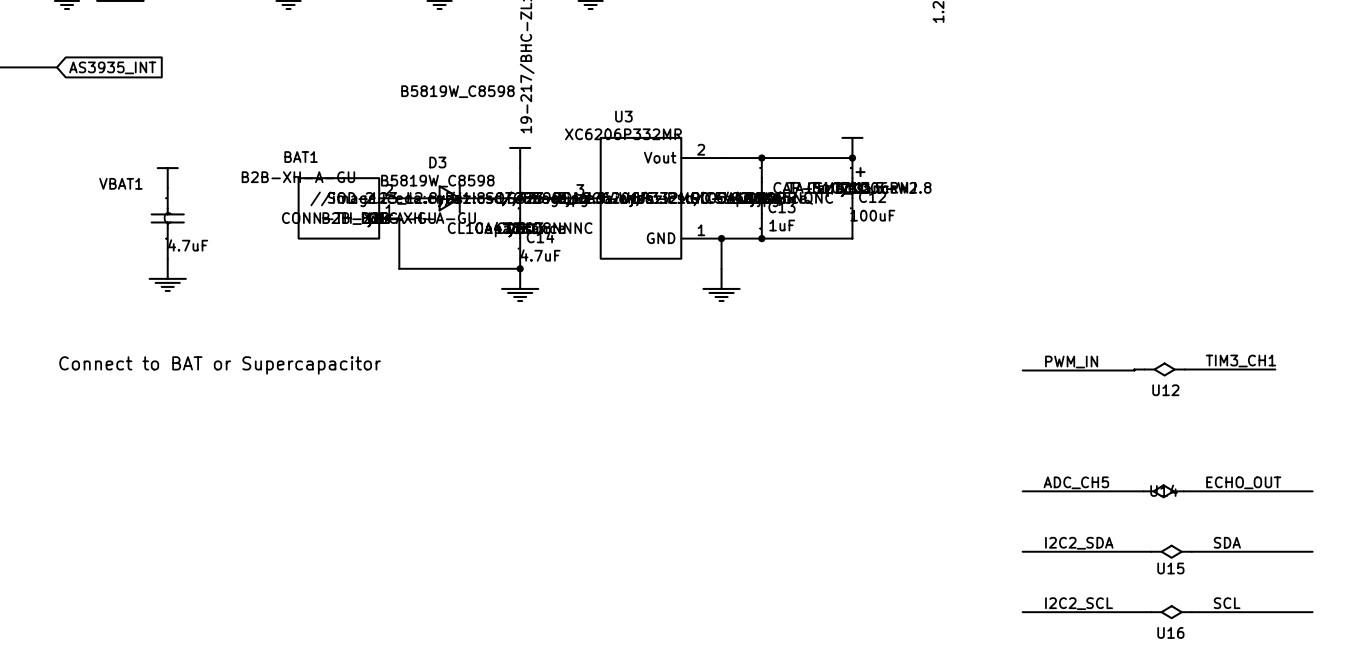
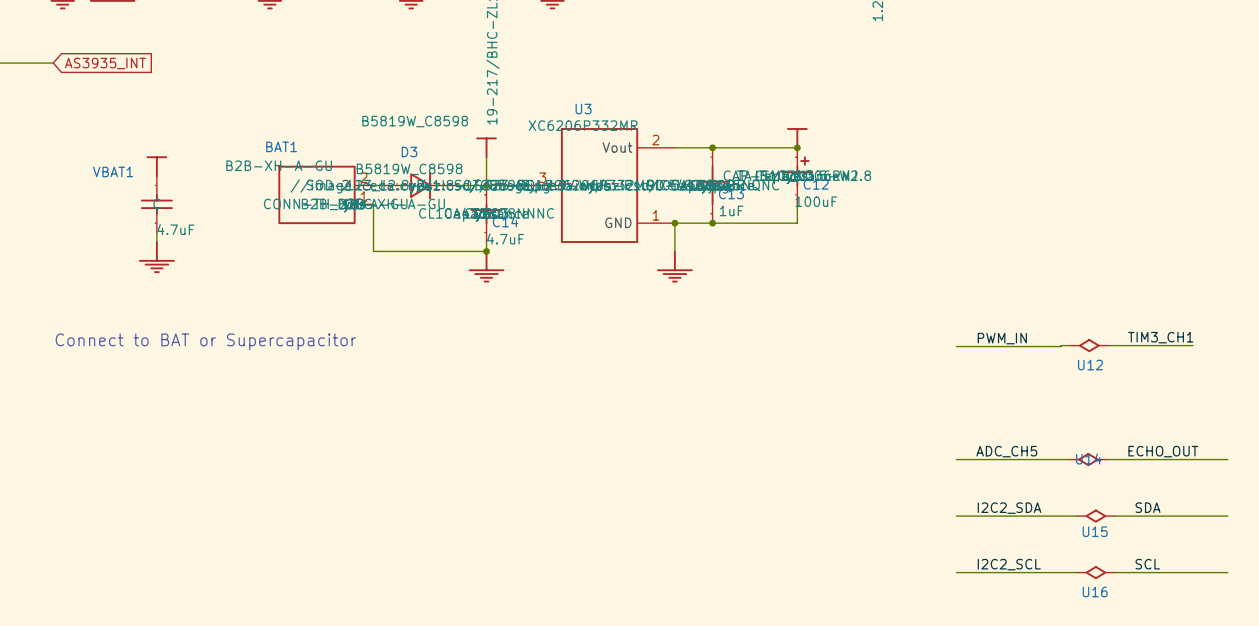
D3 text position: B5819W_C8598 (457, 91) -> B5819W_C8598 (415, 121)

